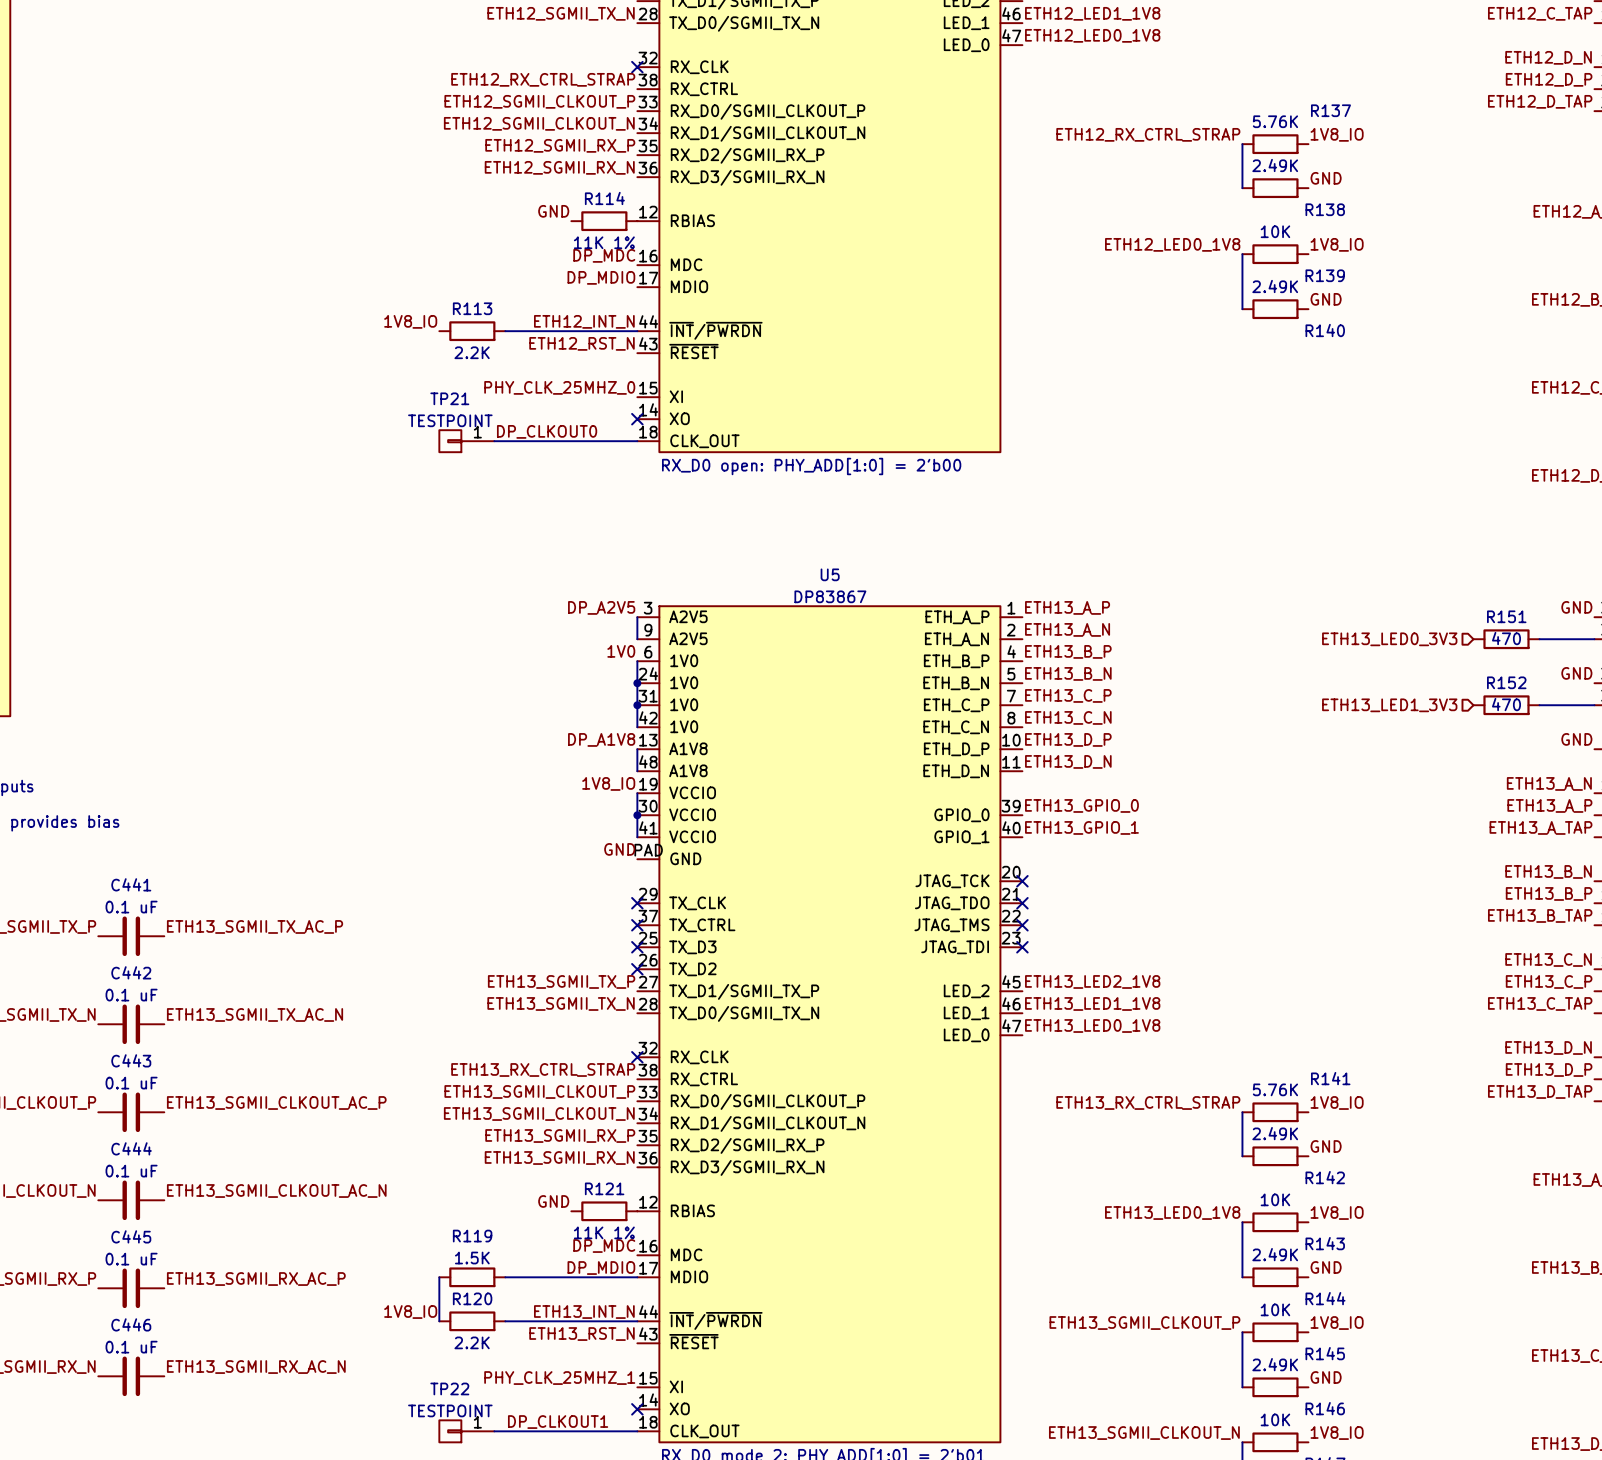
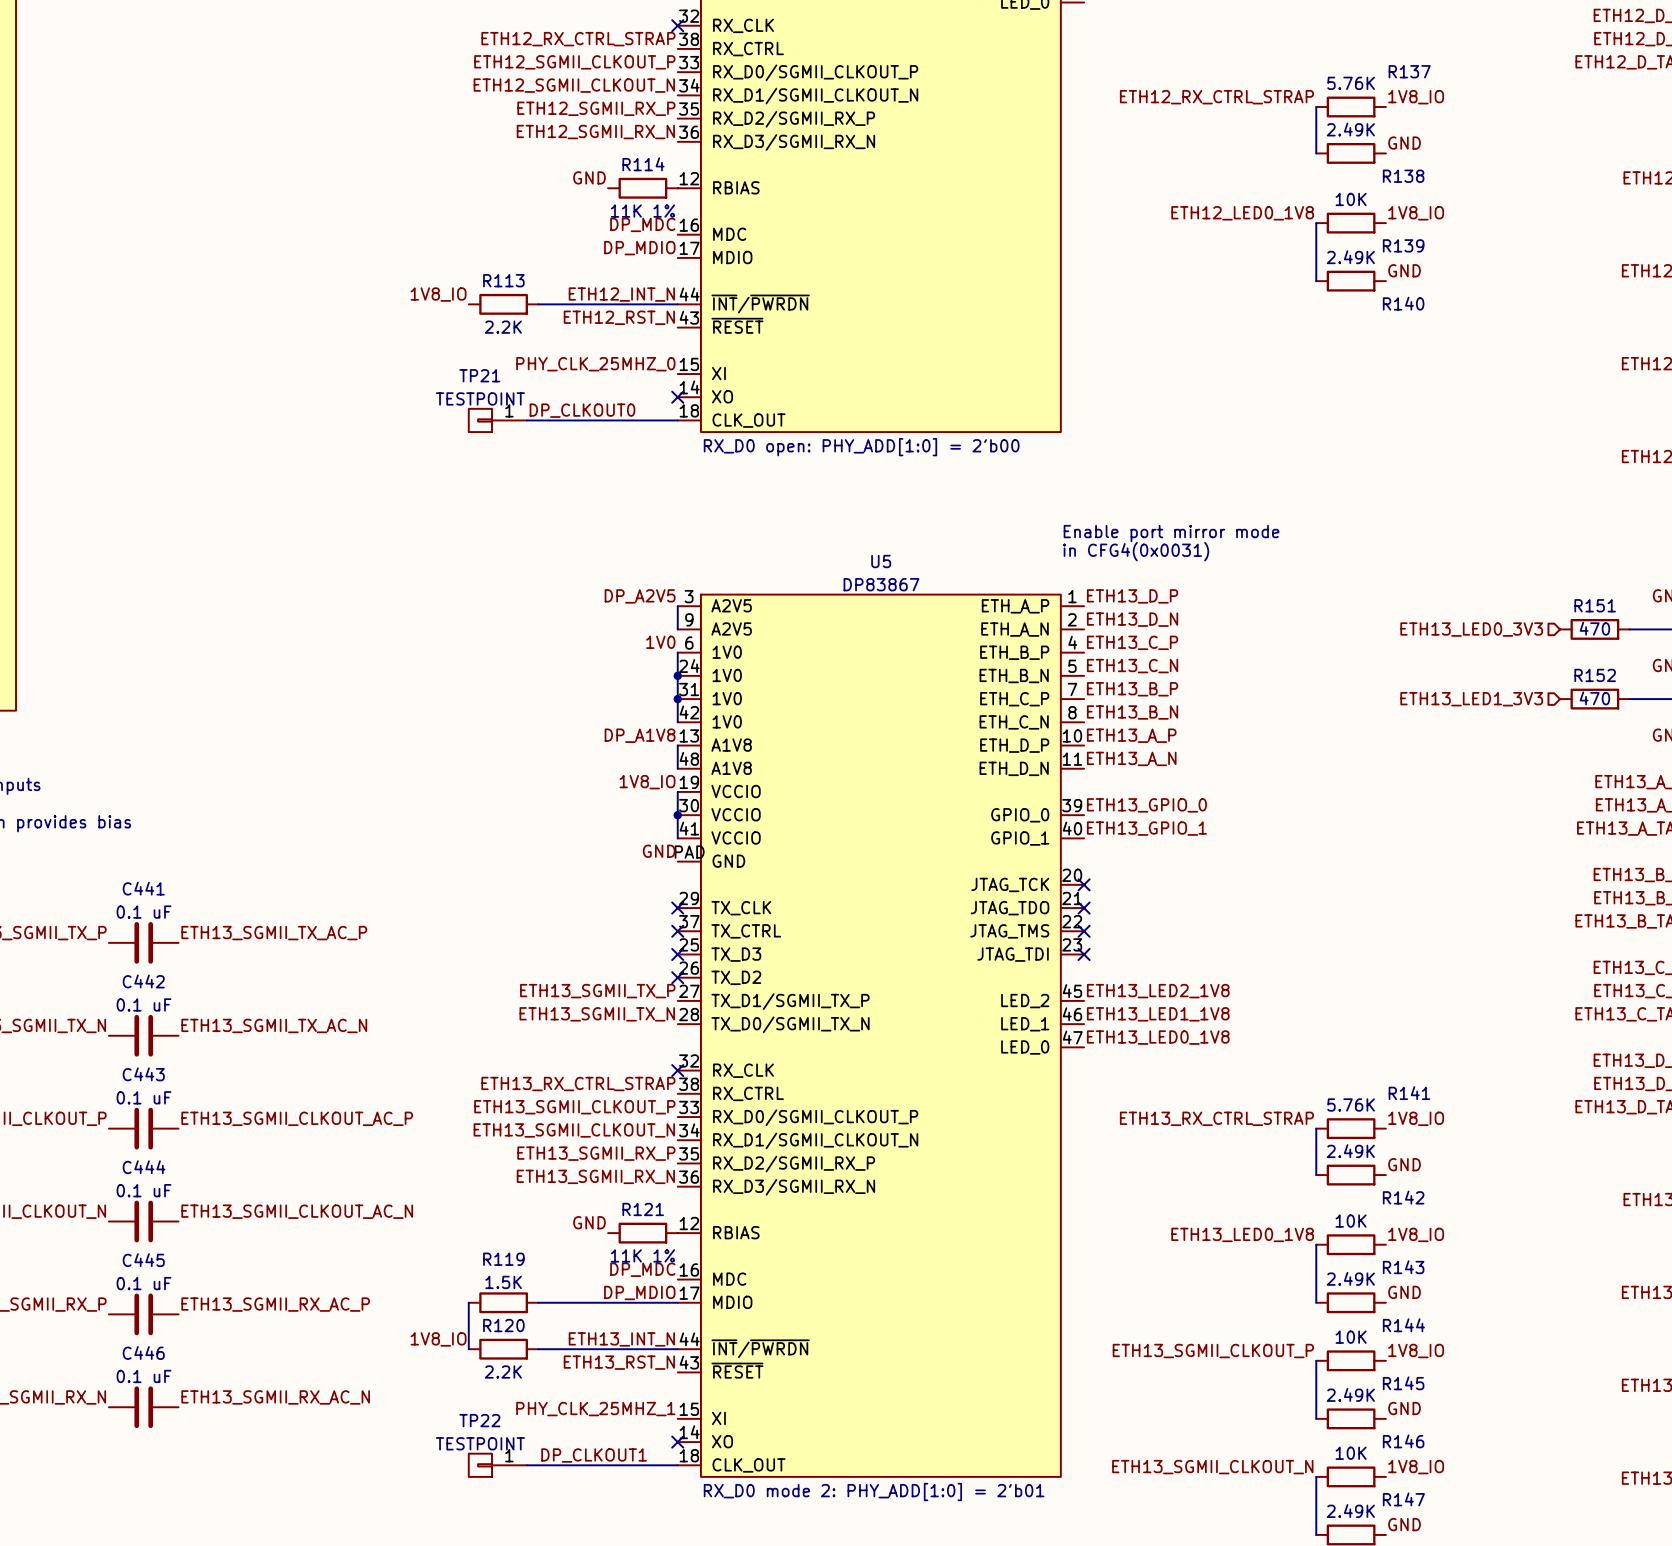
text: none -> Enable port mirror mode (1171, 533)
text: none -> in CFG4(0x0031) (1136, 551)
label: ETH13_A_P (1067, 607) -> ETH13_D_P (1132, 596)
label: ETH13_A_N (1067, 629) -> ETH13_D_N (1132, 619)
label: ETH13_B_P (1068, 651) -> ETH13_C_P (1132, 642)
label: ETH13_B_N (1068, 673) -> ETH13_C_N (1132, 666)
label: ETH13_C_P (1068, 695) -> ETH13_B_P (1132, 689)
label: ETH13_C_N (1068, 717) -> ETH13_B_N (1132, 712)
label: ETH13_D_P (1068, 739) -> ETH13_A_P (1131, 735)
label: ETH13_D_N (1068, 761) -> ETH13_A_N (1131, 758)

